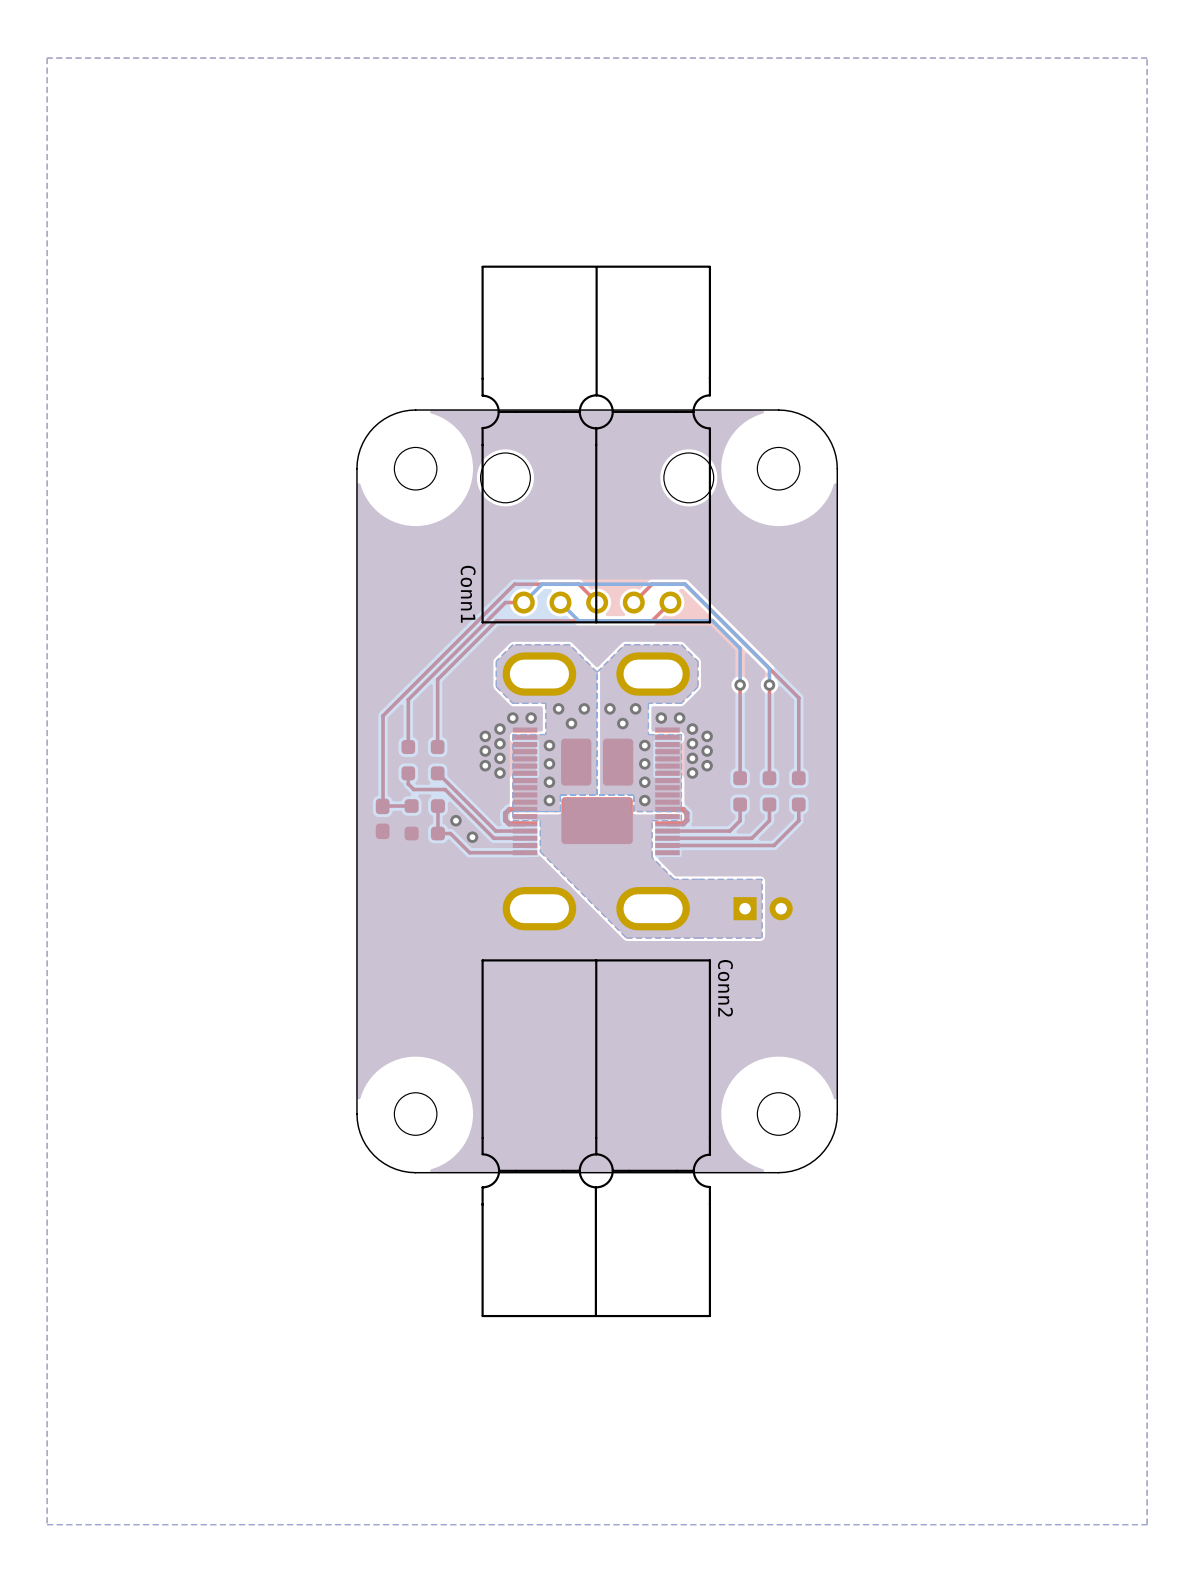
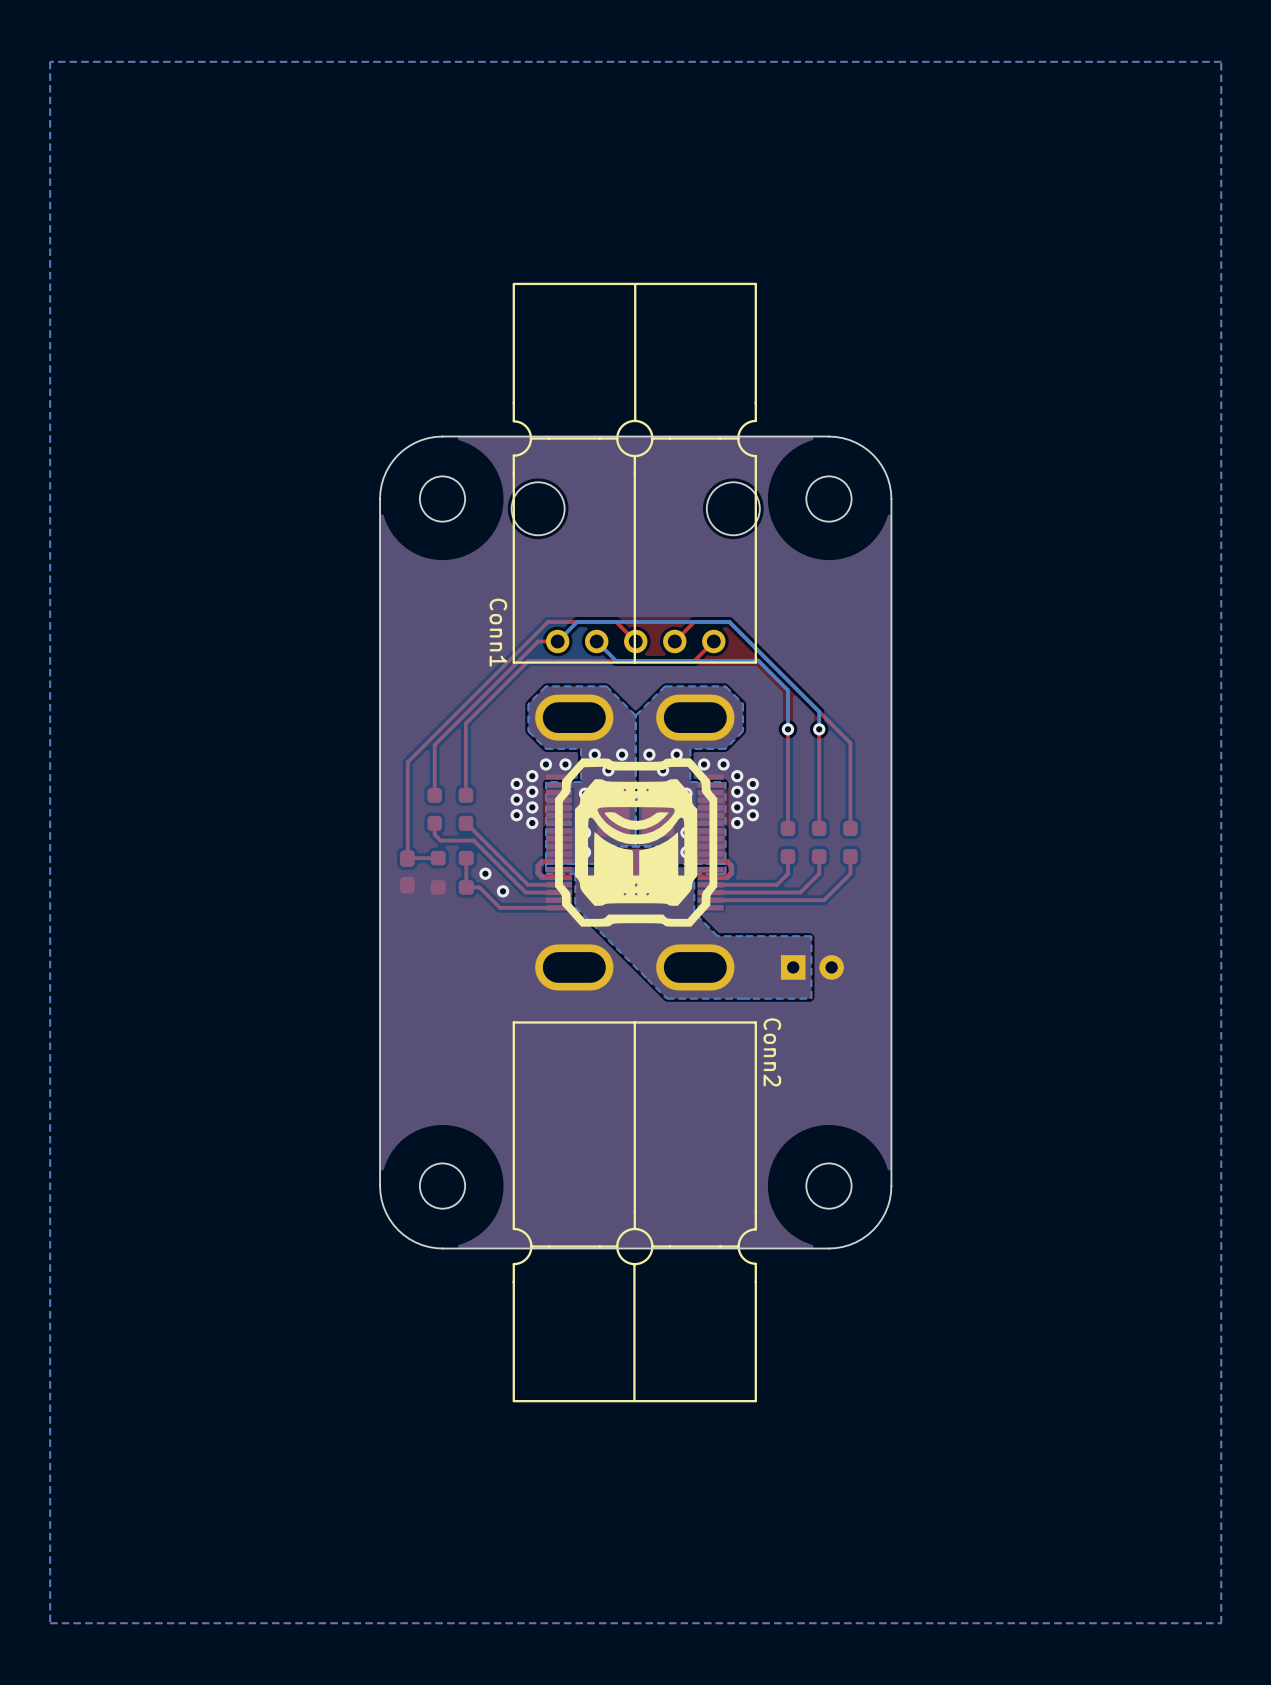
drawing: none -> [555, 758, 718, 927]

